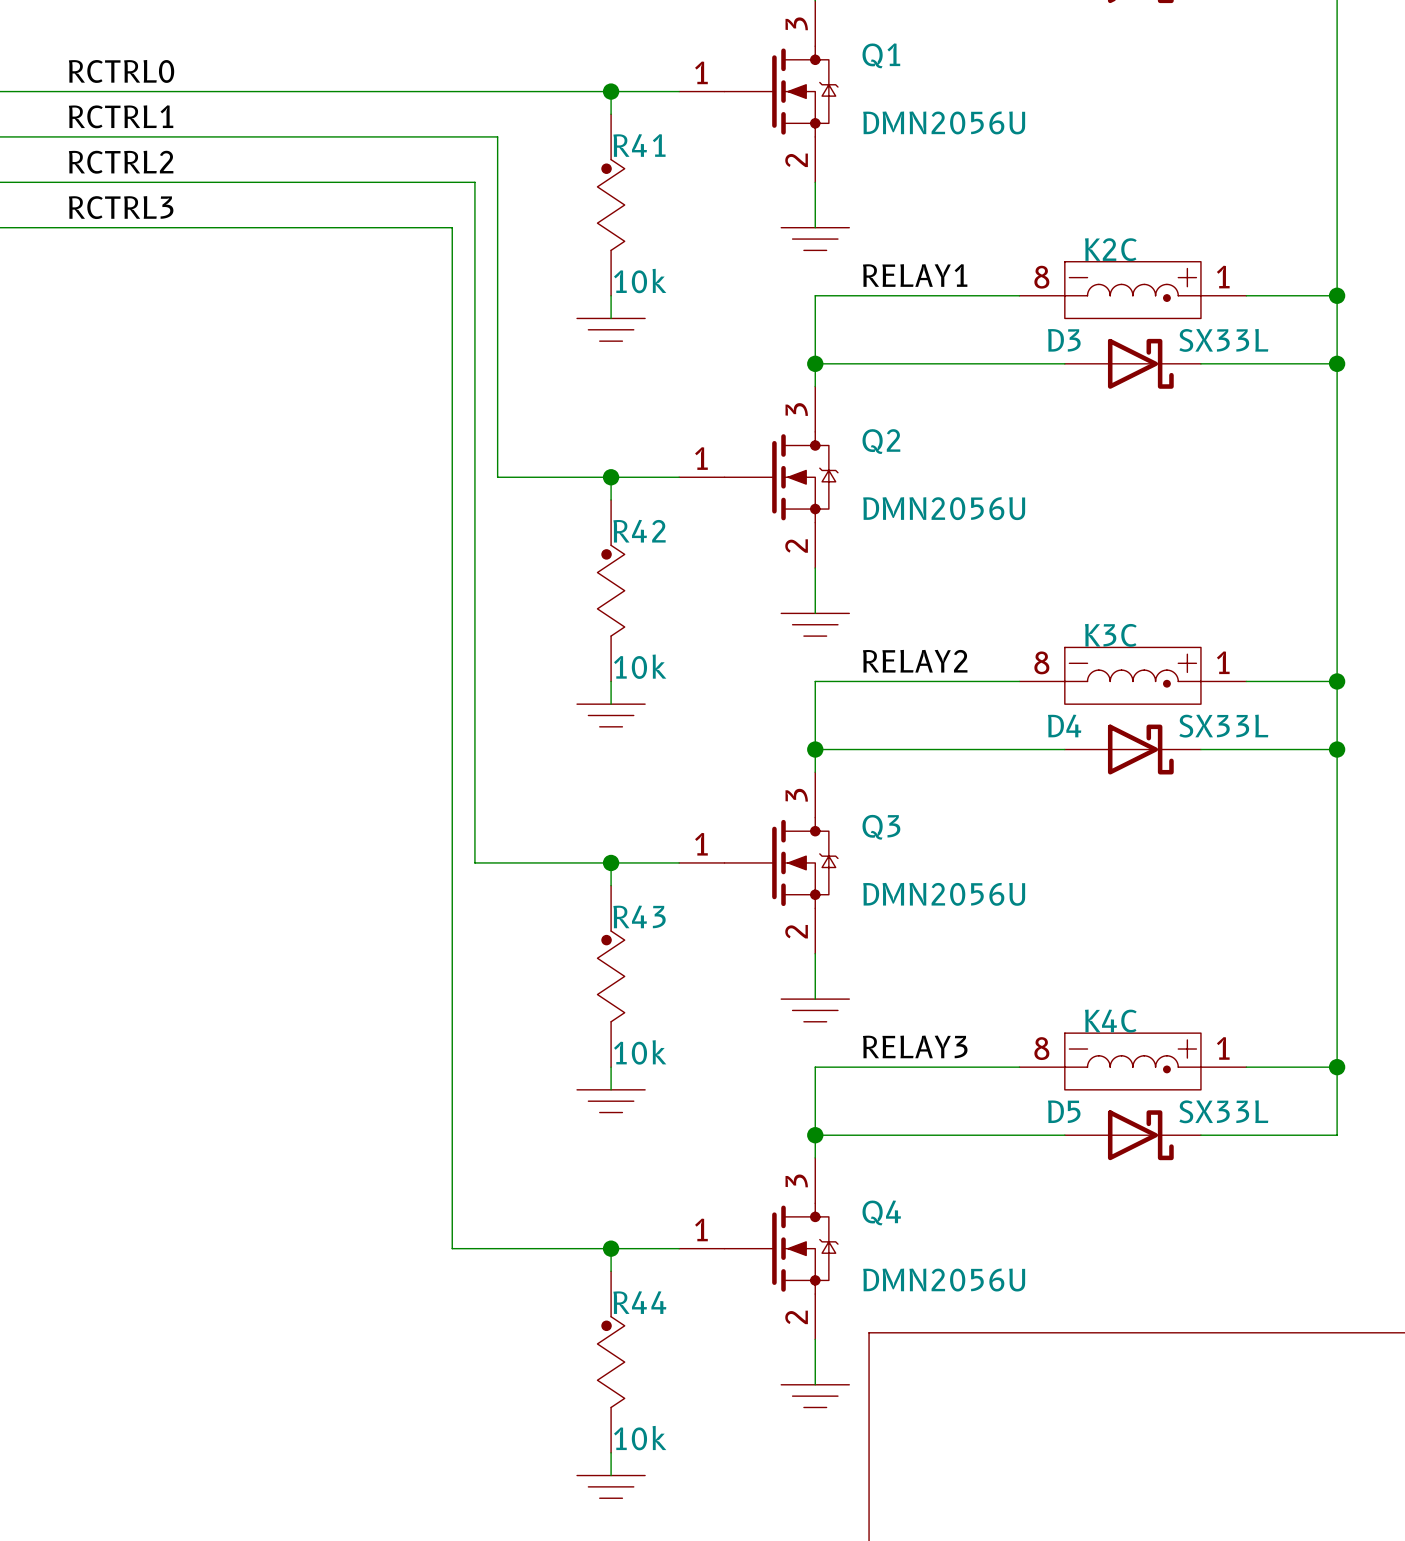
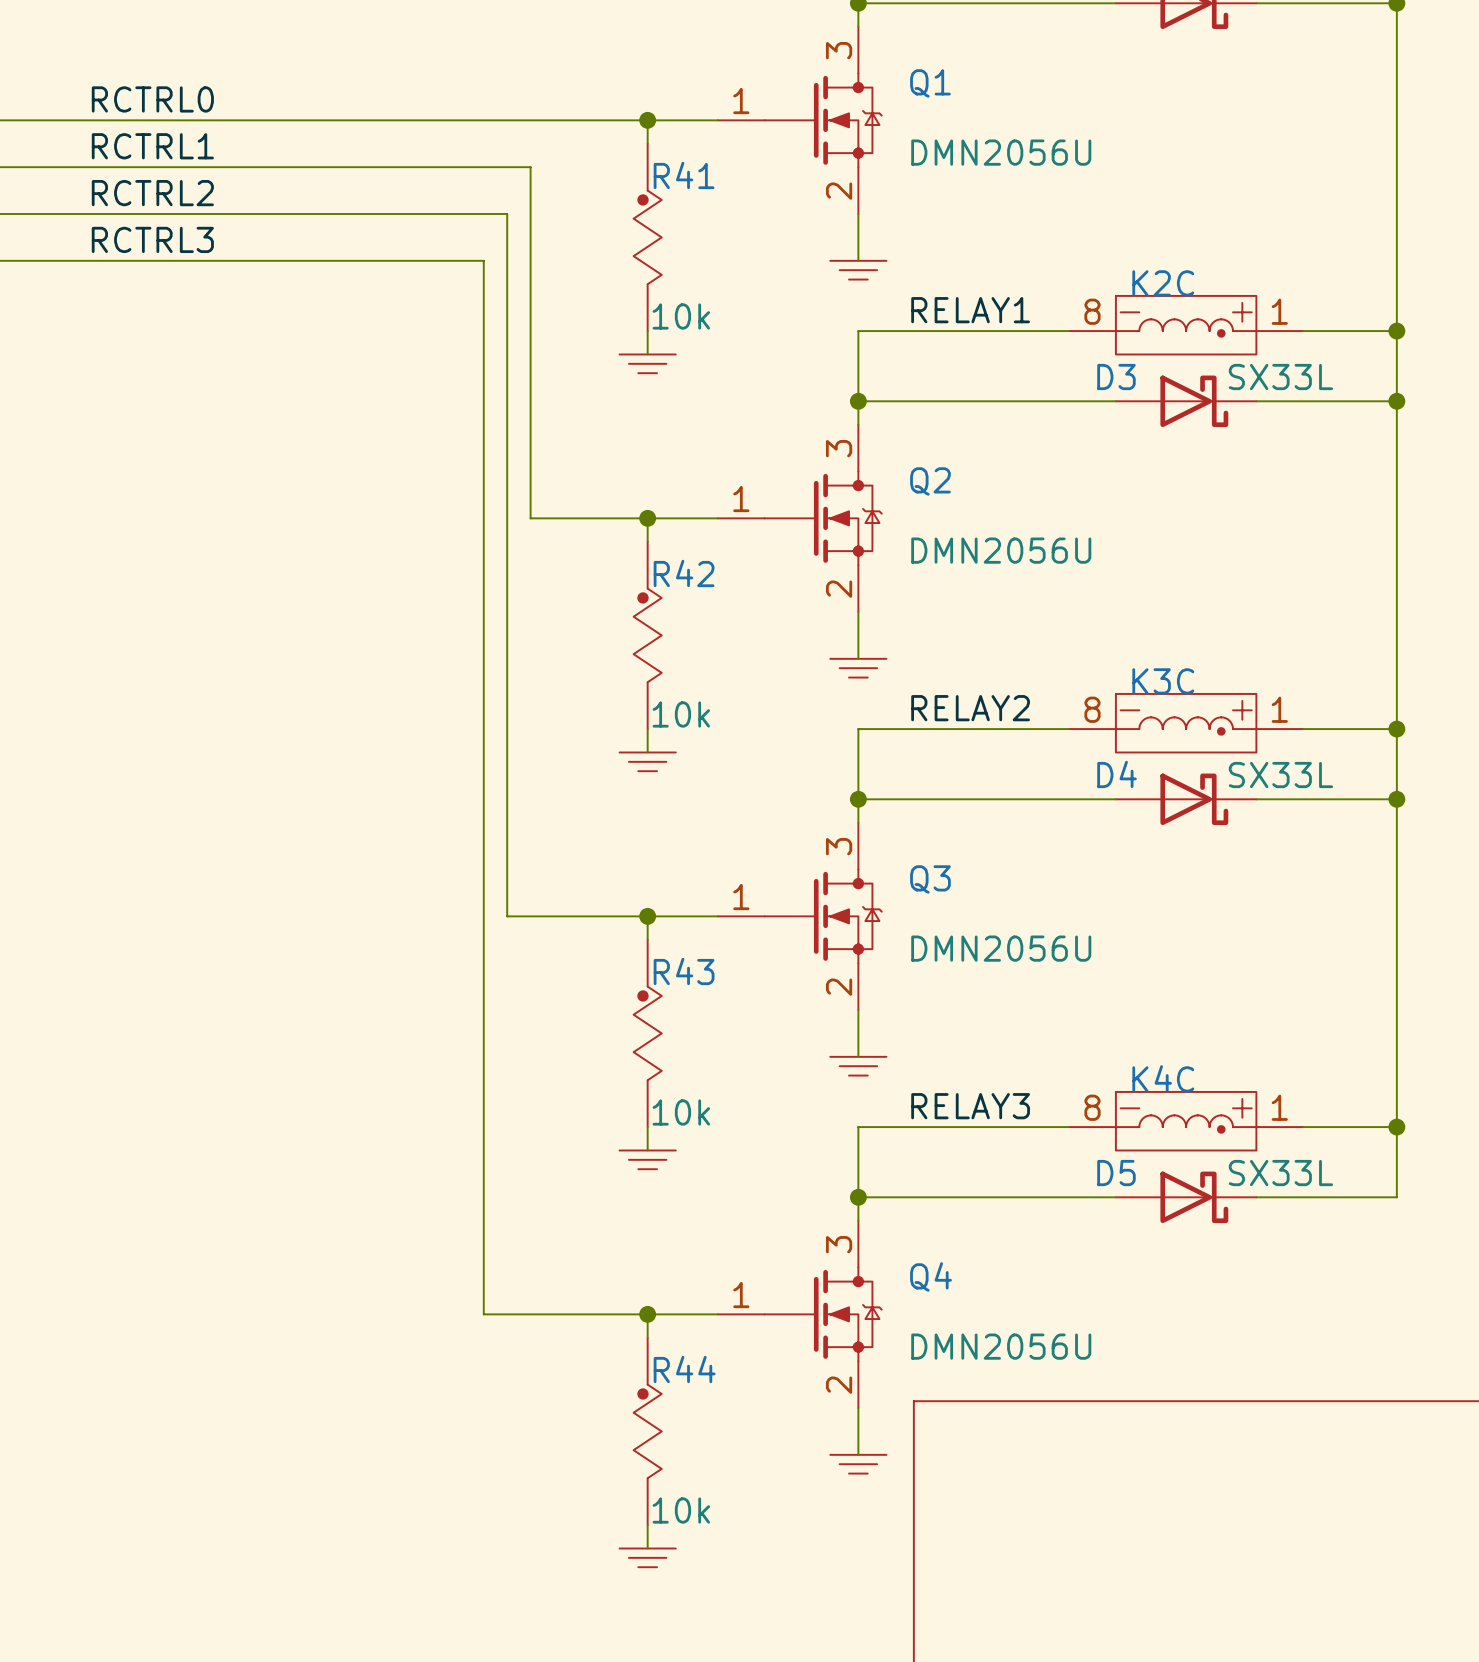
power symbol shape: [781, 227, 850, 251] -> [830, 260, 887, 280]
power symbol shape: [577, 318, 646, 342] -> [619, 354, 676, 374]
power symbol shape: [781, 613, 850, 637] -> [830, 658, 887, 678]
power symbol shape: [577, 704, 646, 727] -> [619, 752, 676, 772]
power symbol shape: [781, 999, 850, 1022] -> [830, 1056, 887, 1076]
power symbol shape: [577, 1089, 646, 1113] -> [619, 1150, 676, 1170]
power symbol shape: [781, 1384, 850, 1408] -> [830, 1454, 887, 1474]
power symbol shape: [577, 1475, 646, 1499] -> [619, 1548, 676, 1568]

